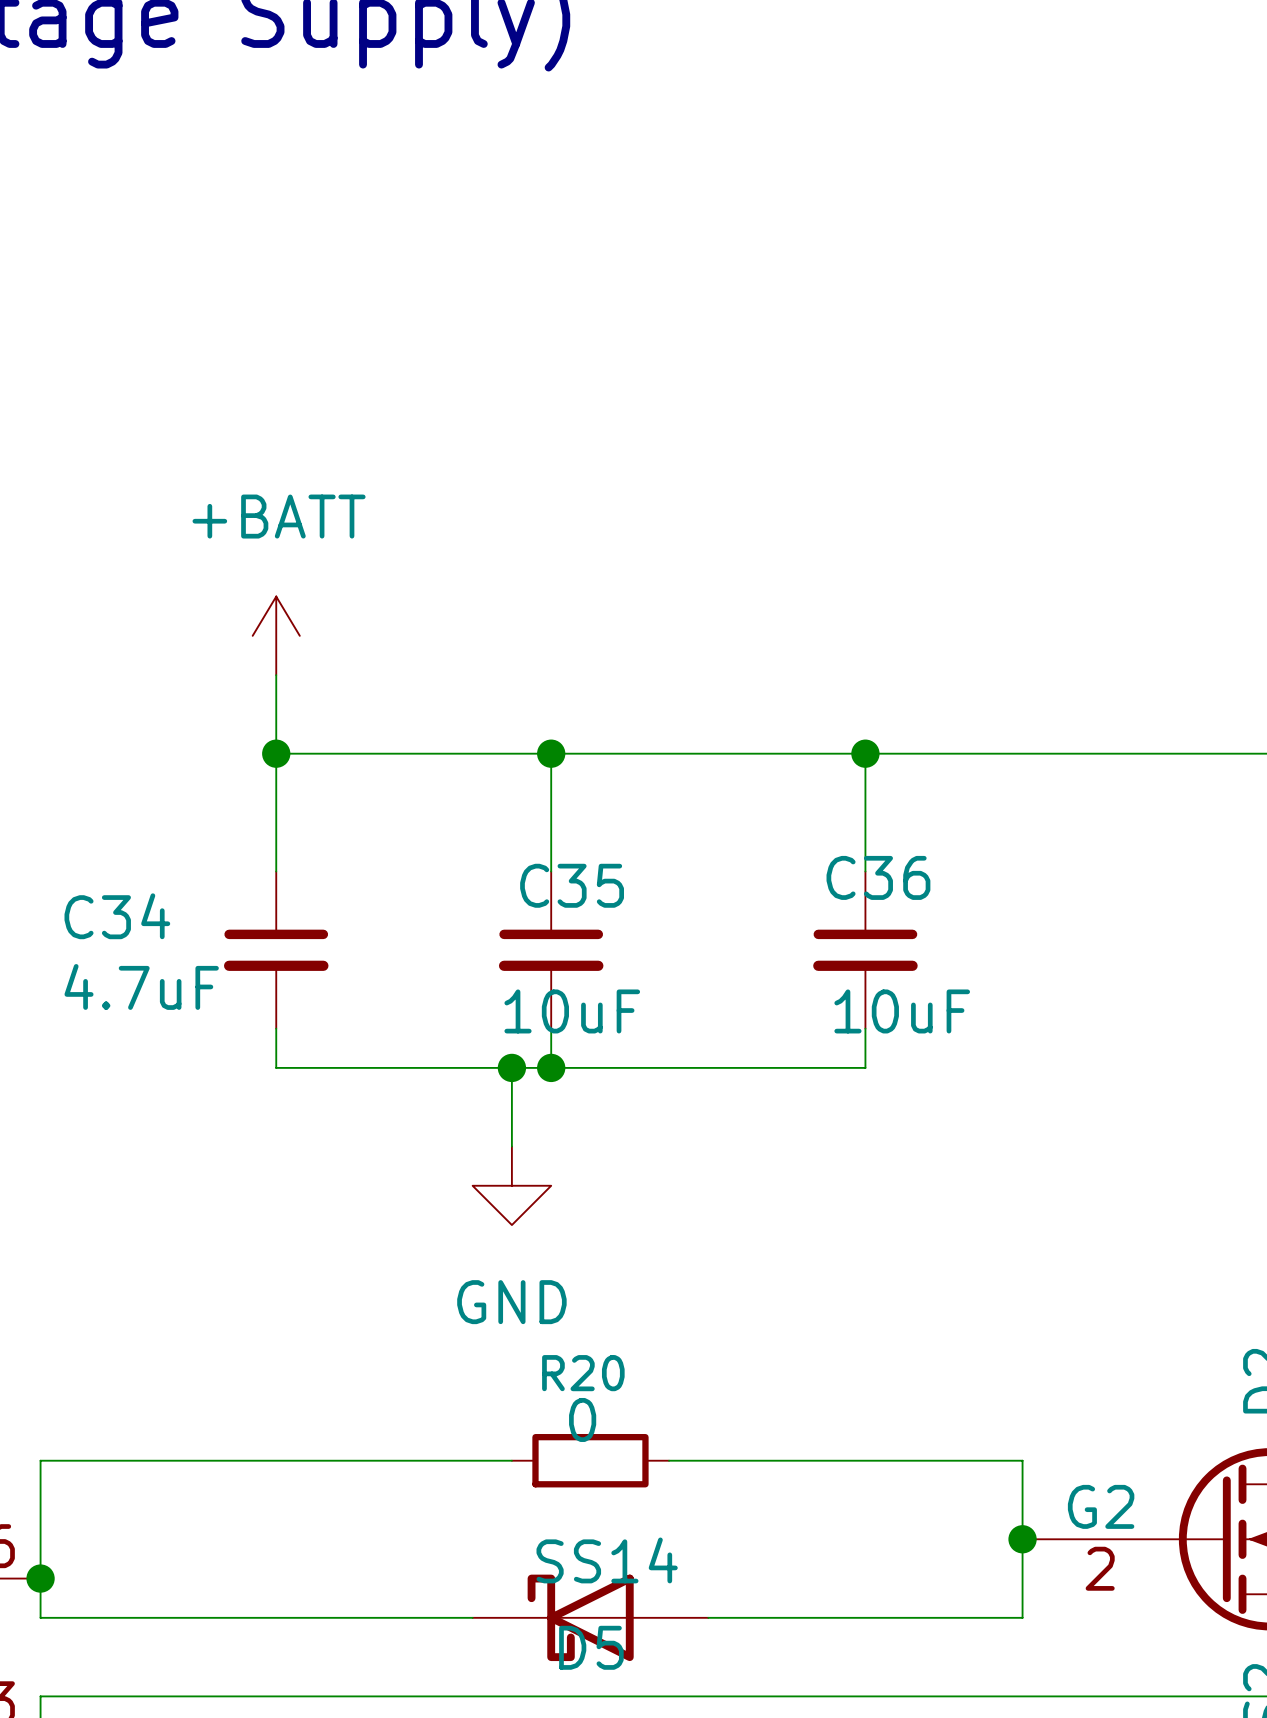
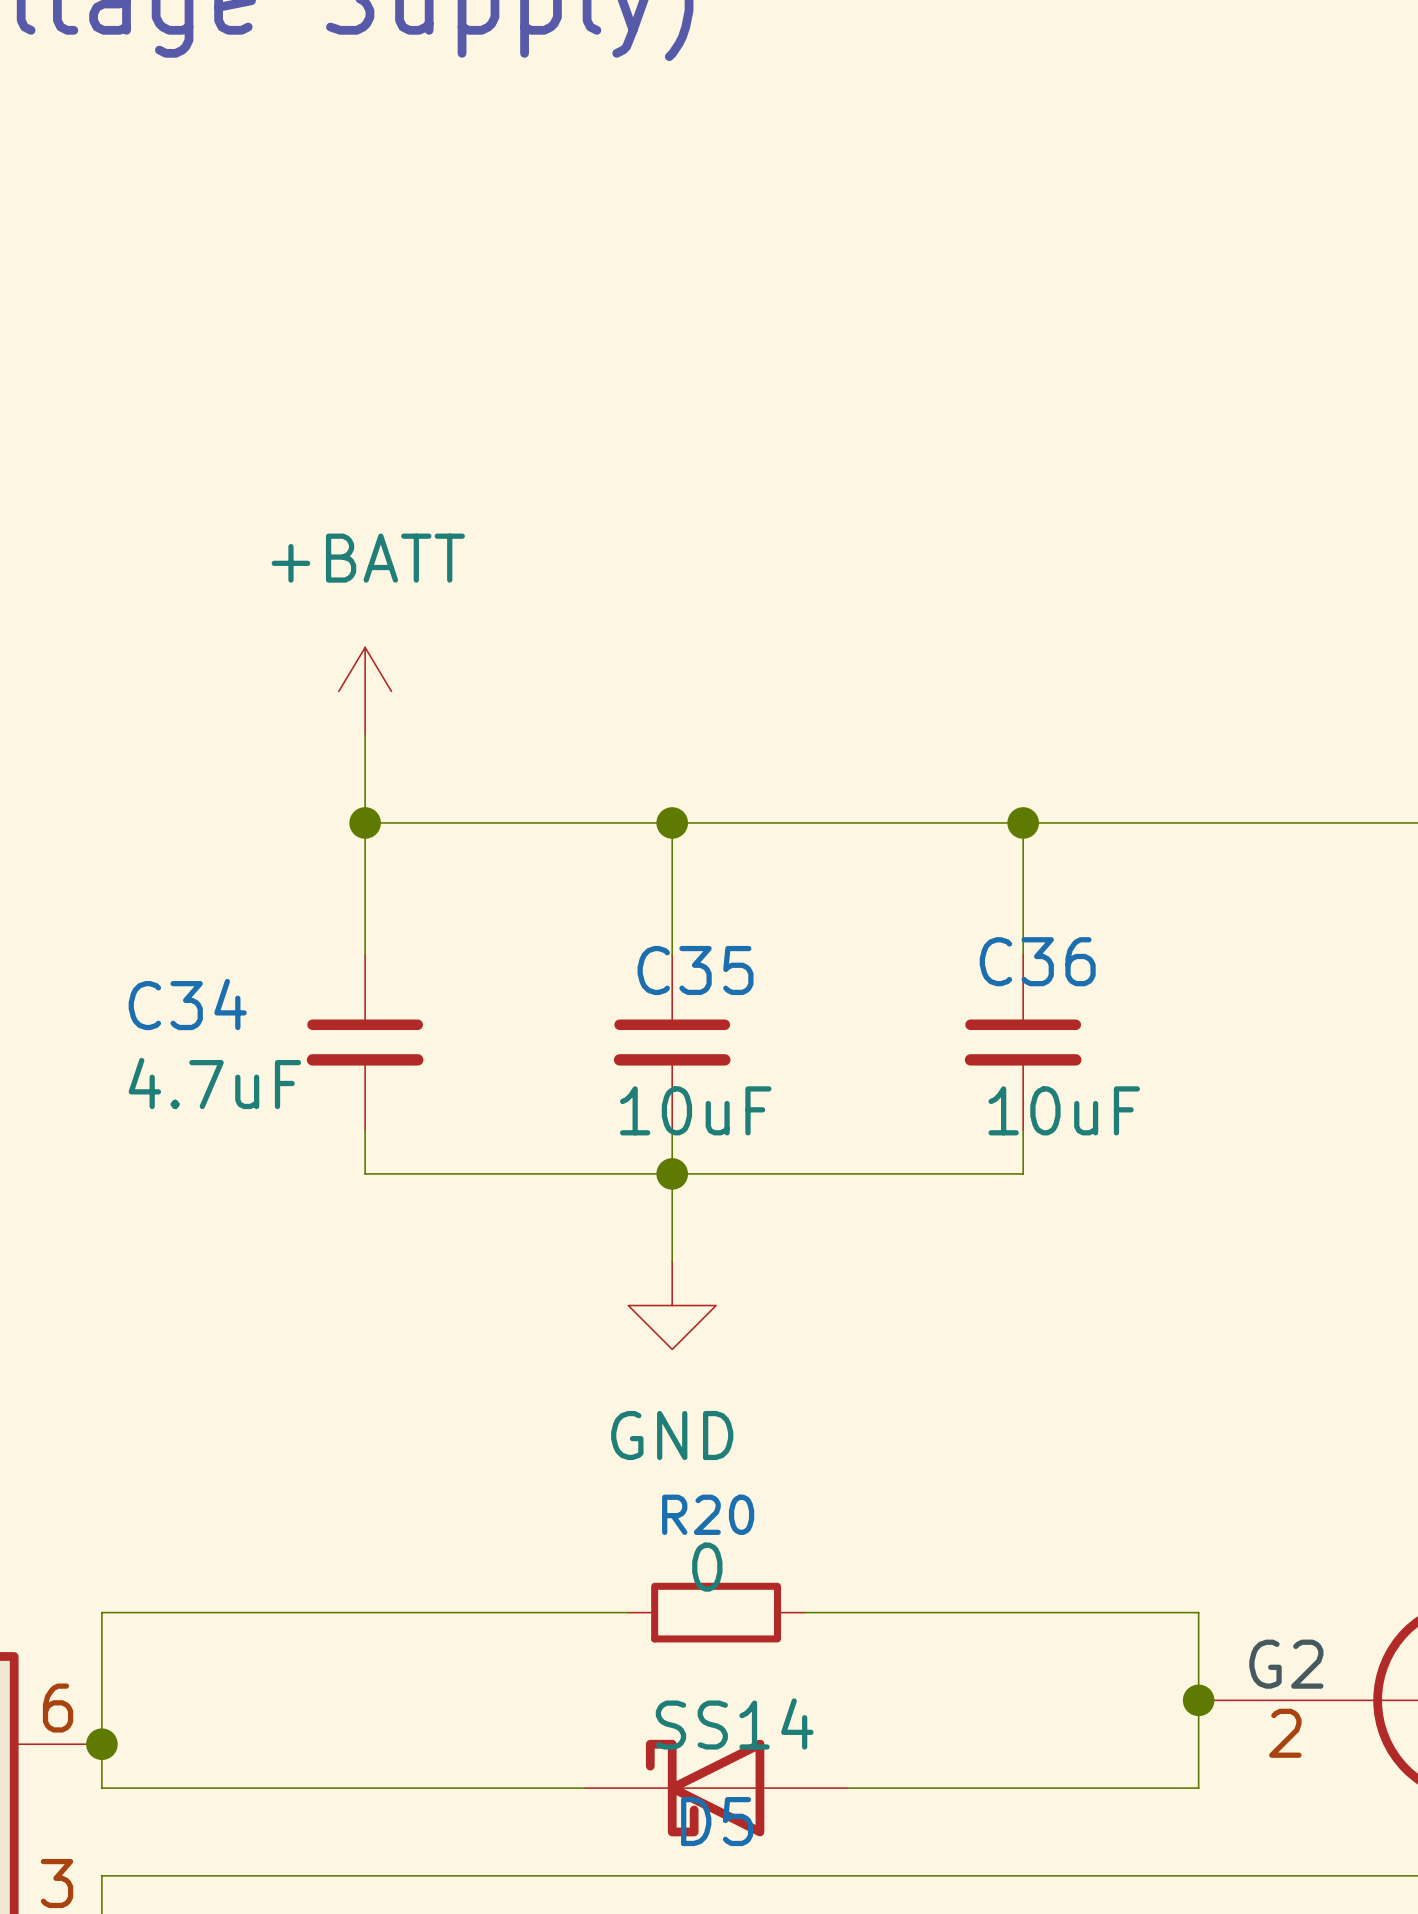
wire: (511, 1067) (511, 1146) -> (672, 1173) (672, 1261)
junction: (511, 1067) -> none
power symbol position: GND (511, 1185) -> GND (672, 1305)

